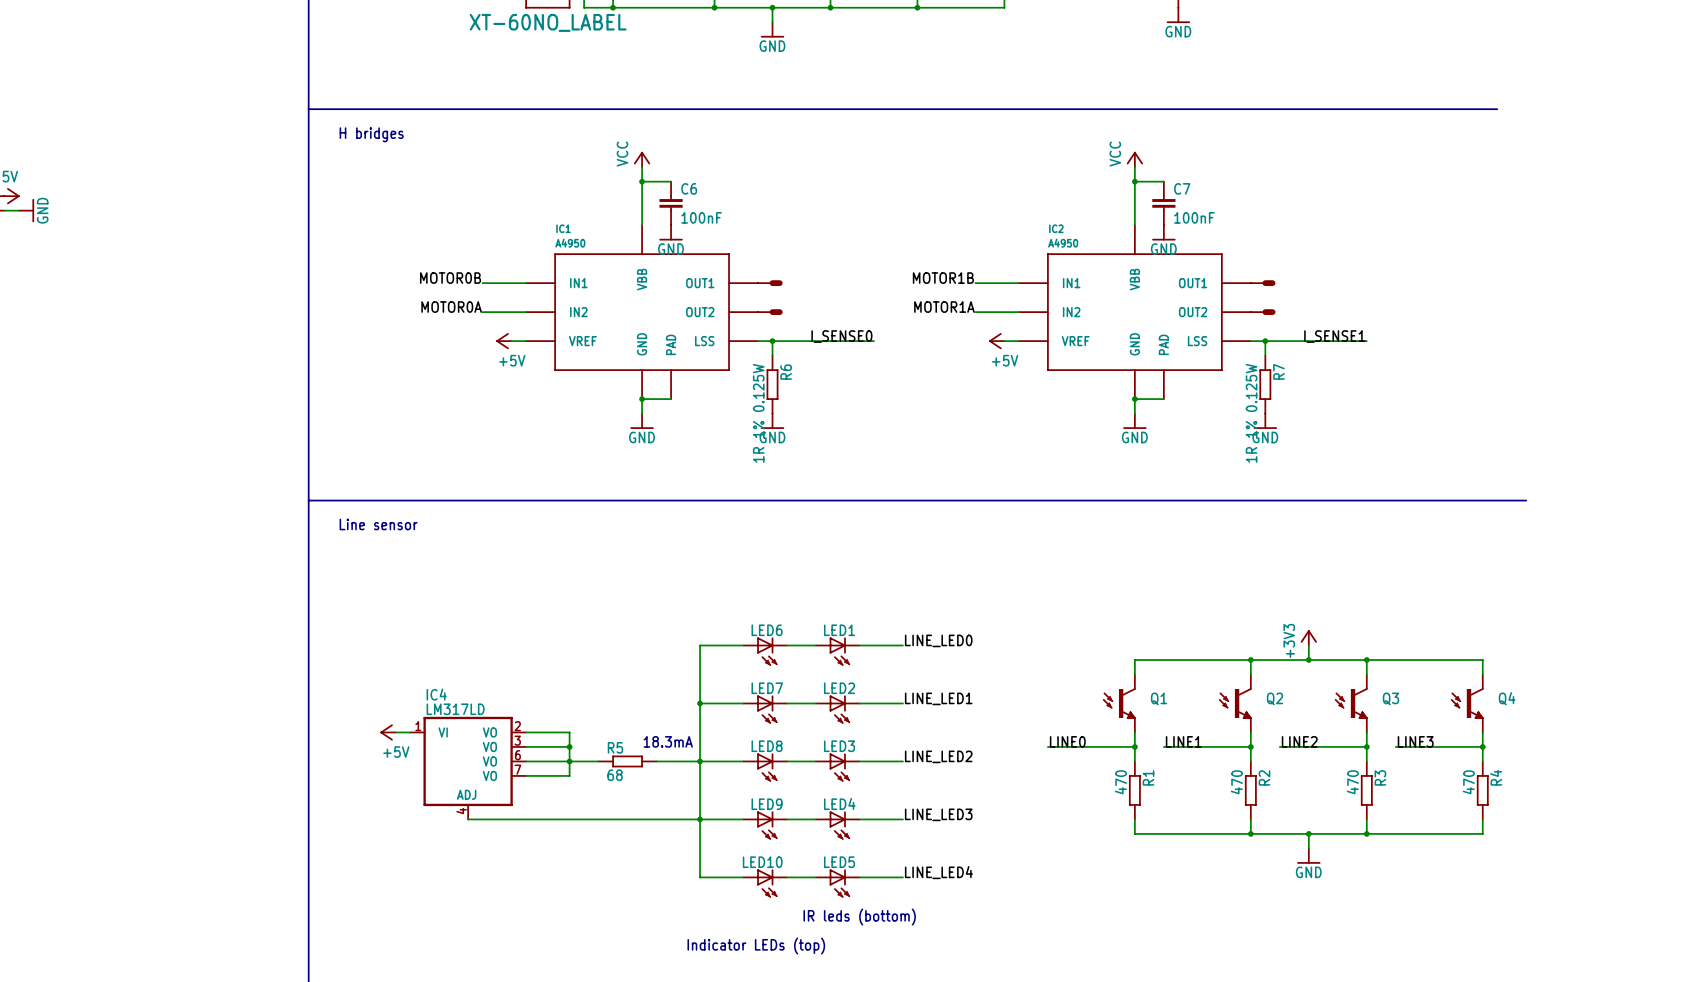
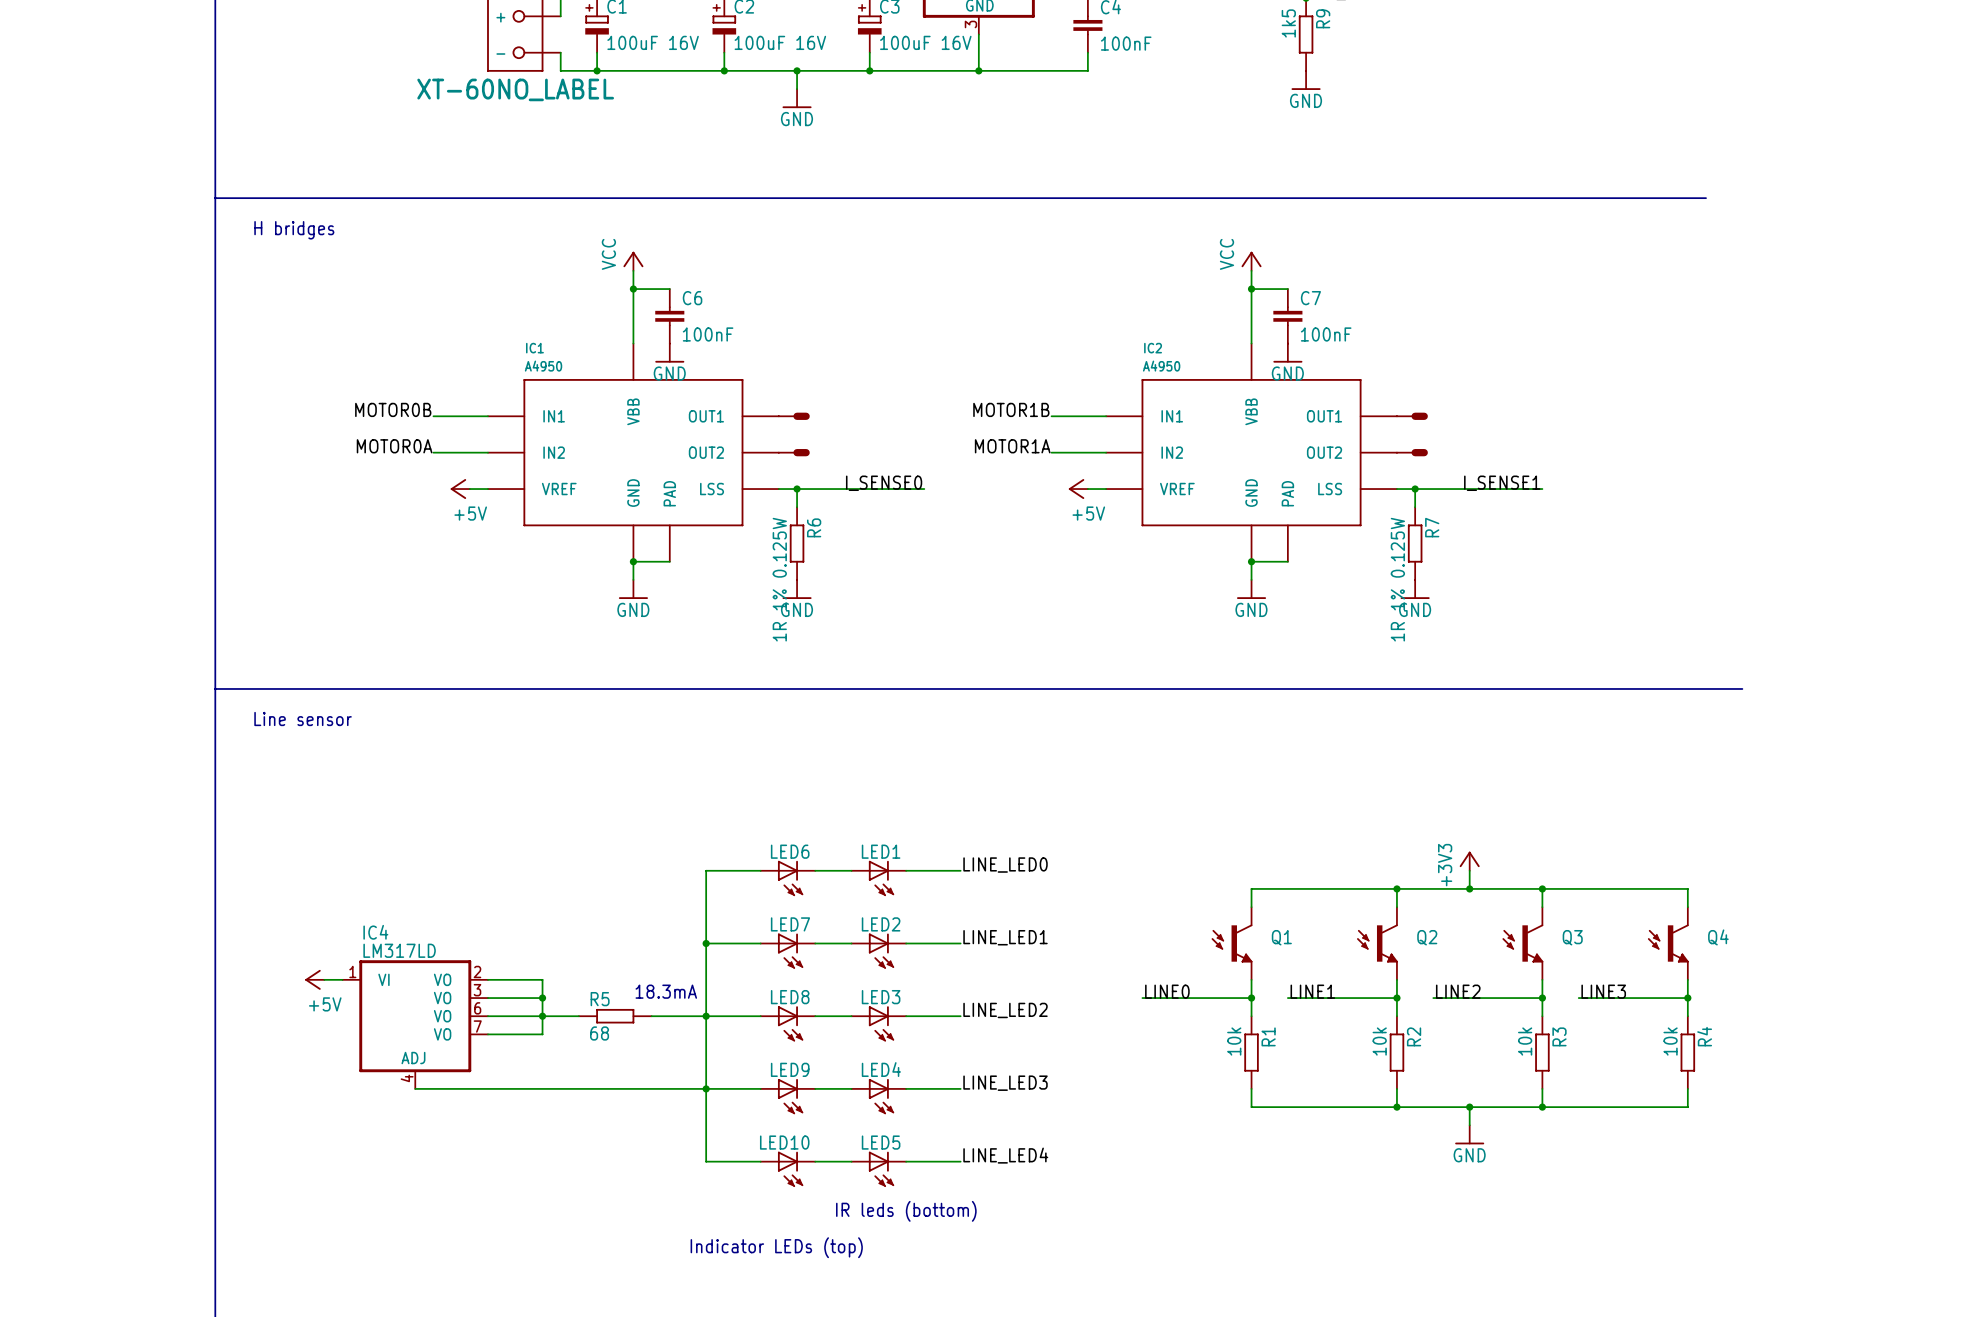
R1 value: 470 (1120, 782) -> 10k (1234, 1041)
R2 value: 470 (1236, 782) -> 10k (1379, 1041)
R3 value: 470 (1352, 782) -> 10k (1525, 1041)
R4 value: 470 (1468, 782) -> 10k (1670, 1041)

